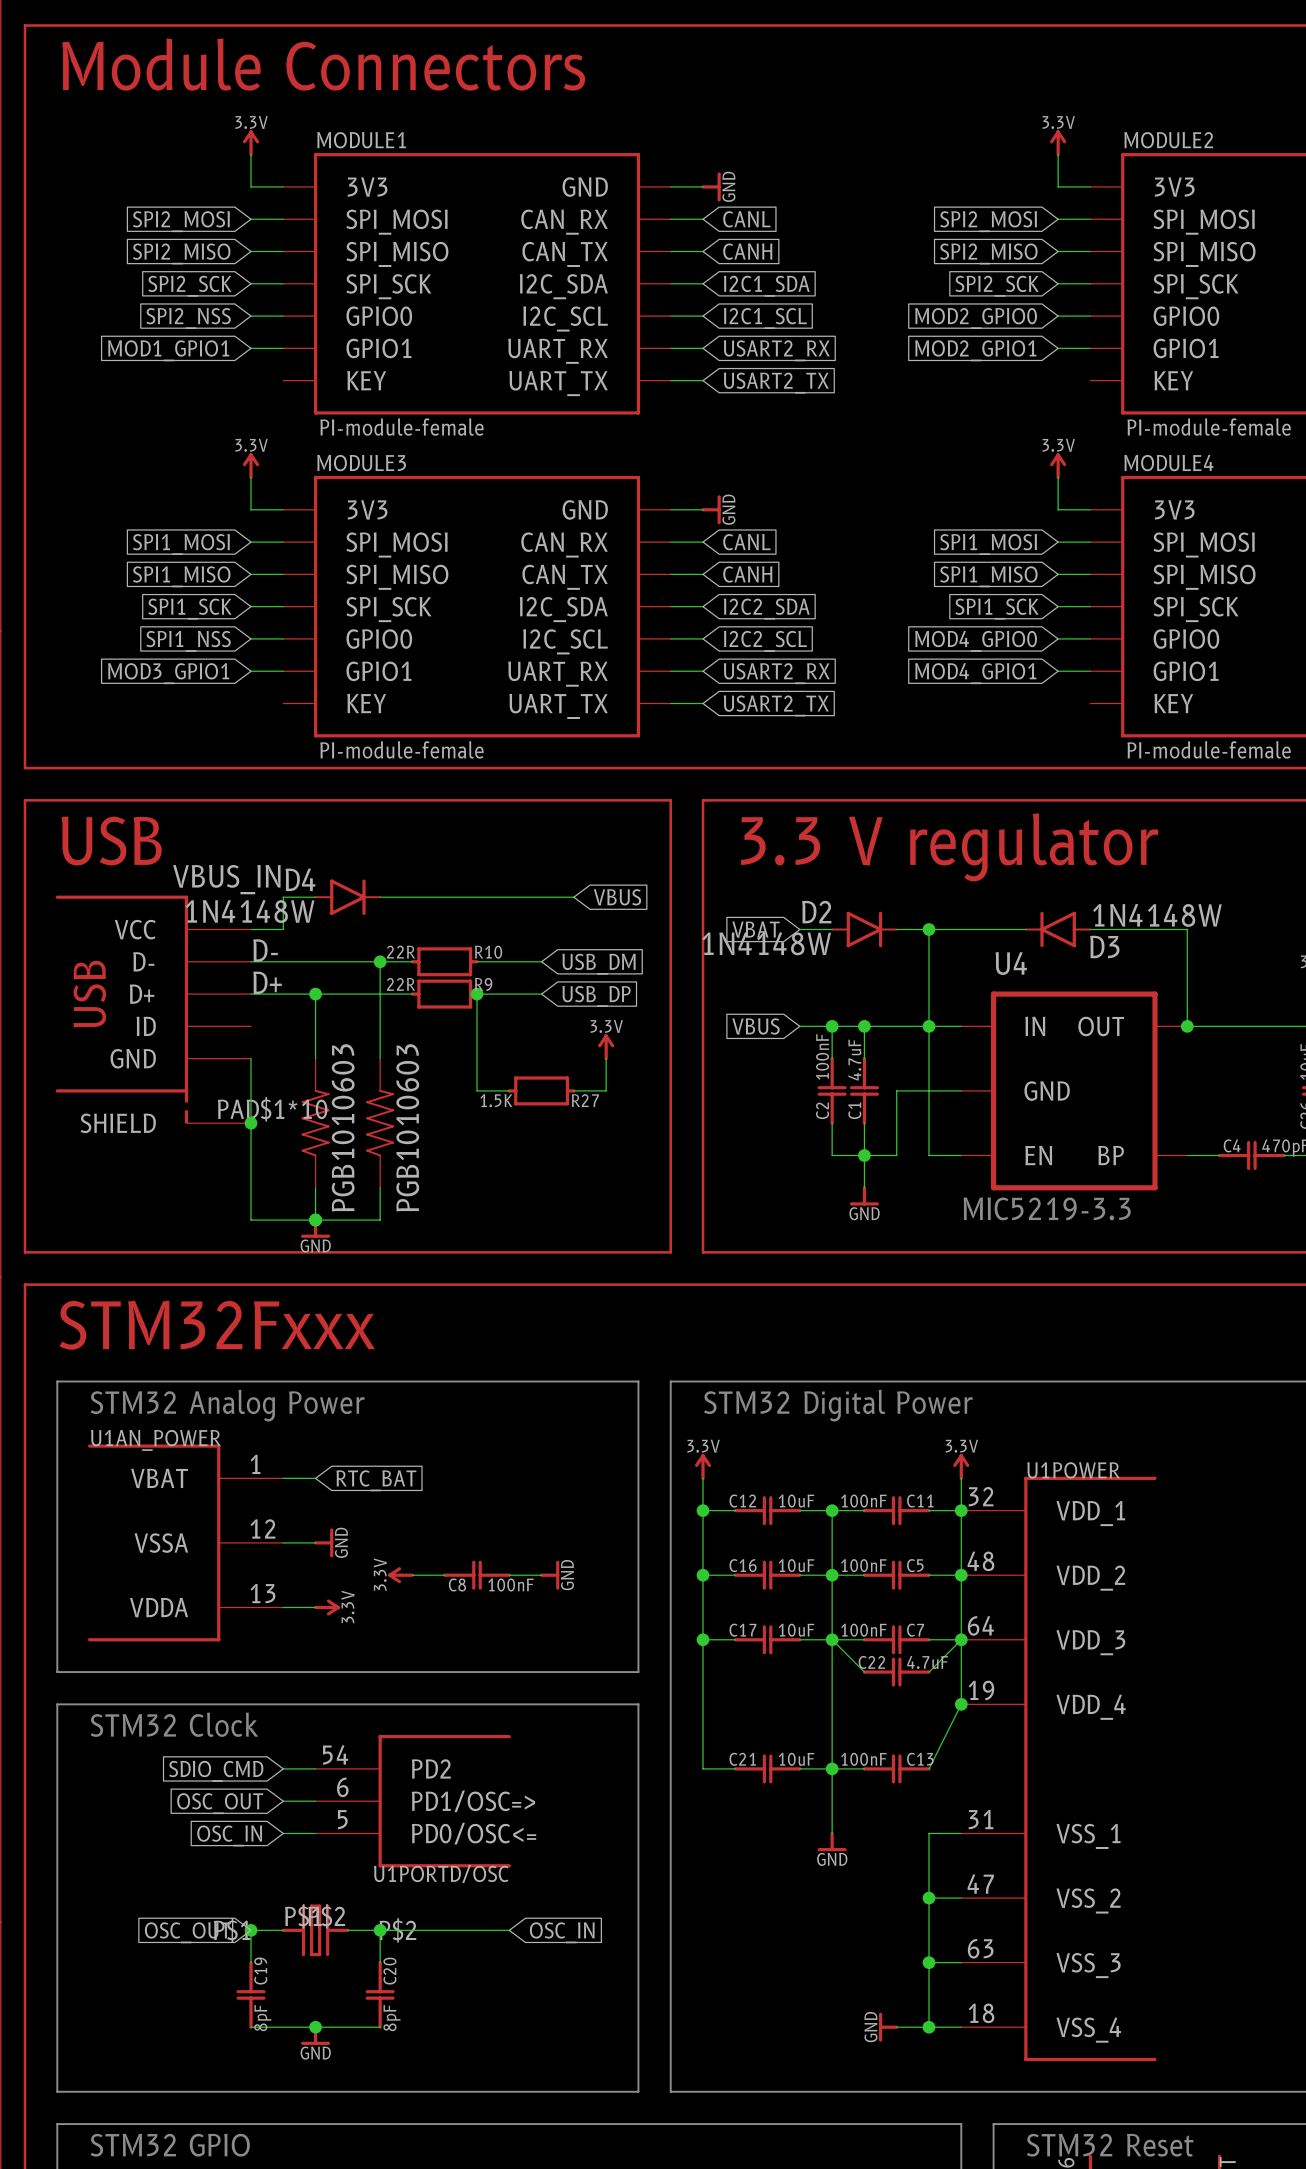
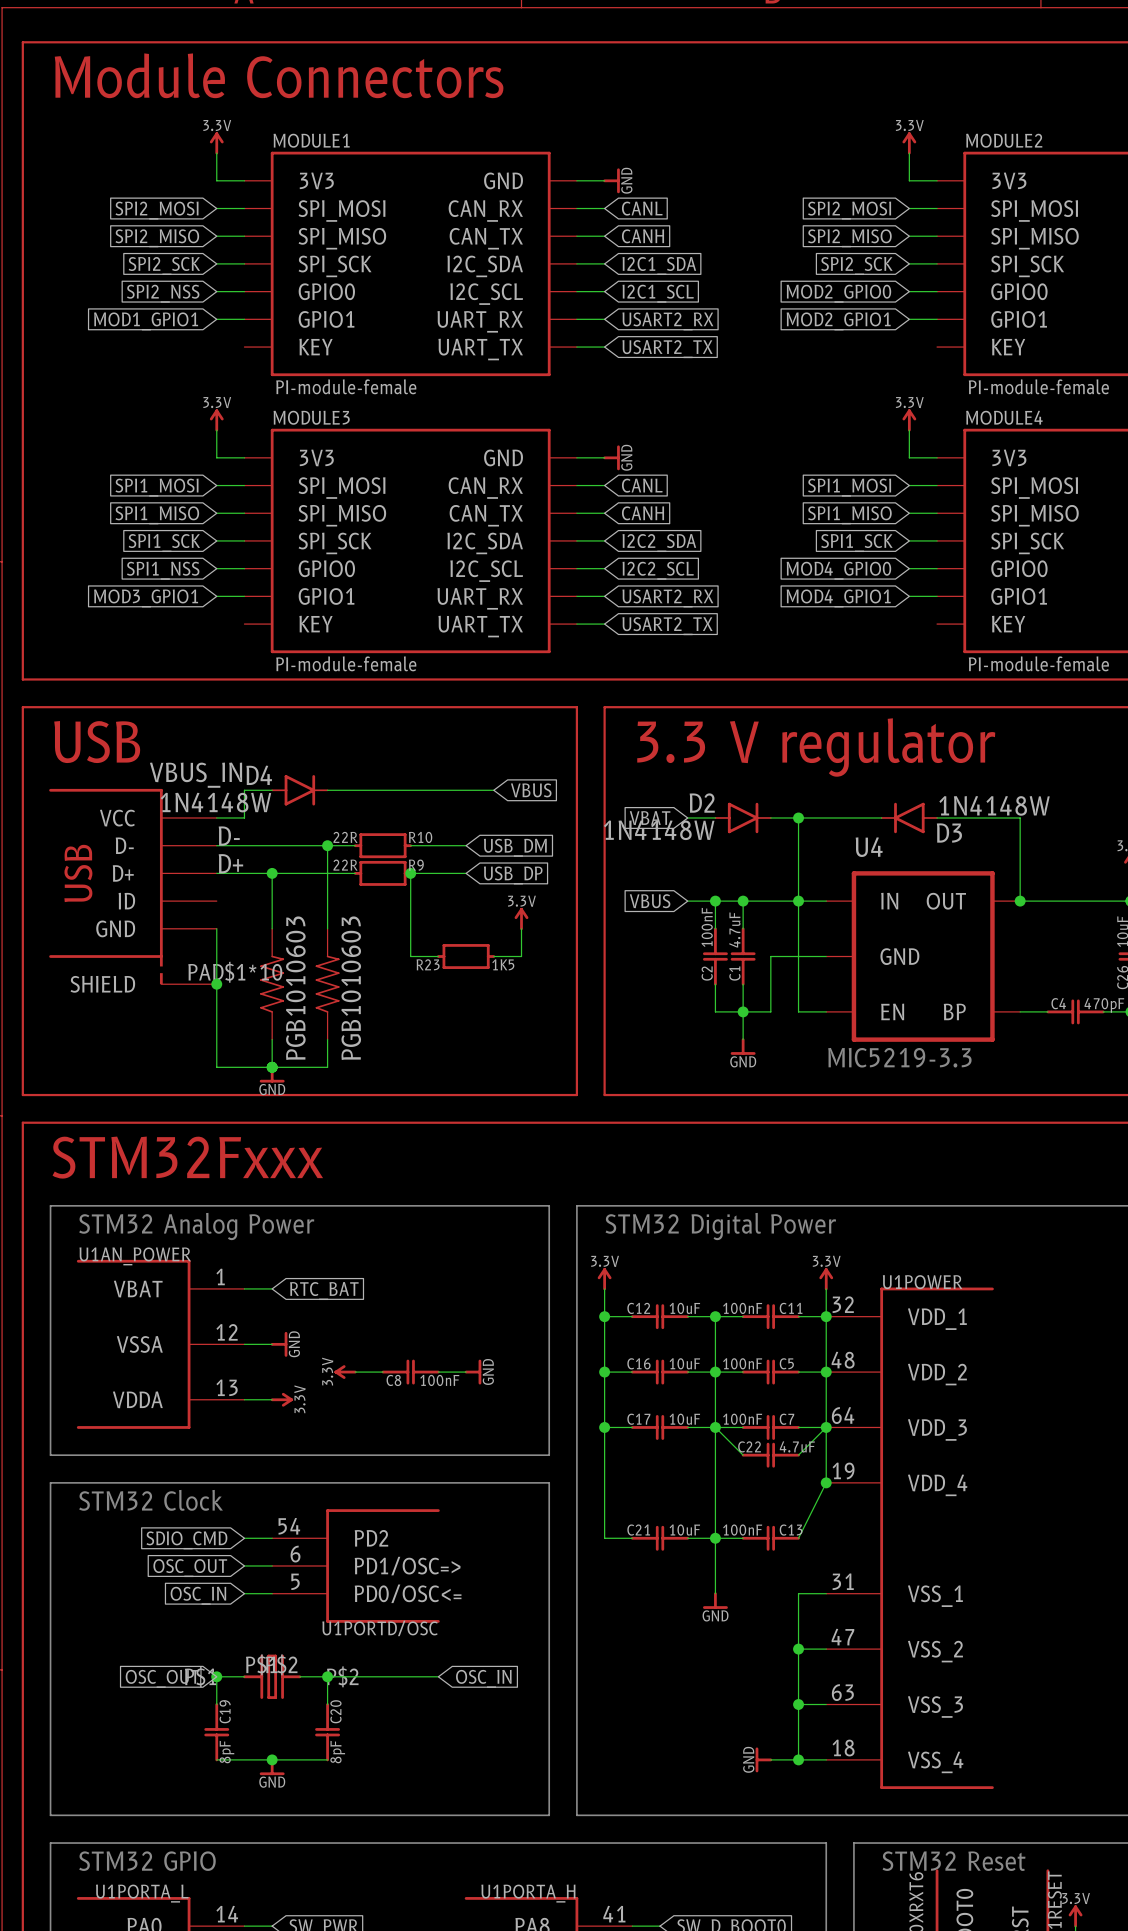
R27 value: 1.5K (496, 1100) -> 1K5 (503, 964)
R27 name: R27 (585, 1100) -> R23 (428, 964)

